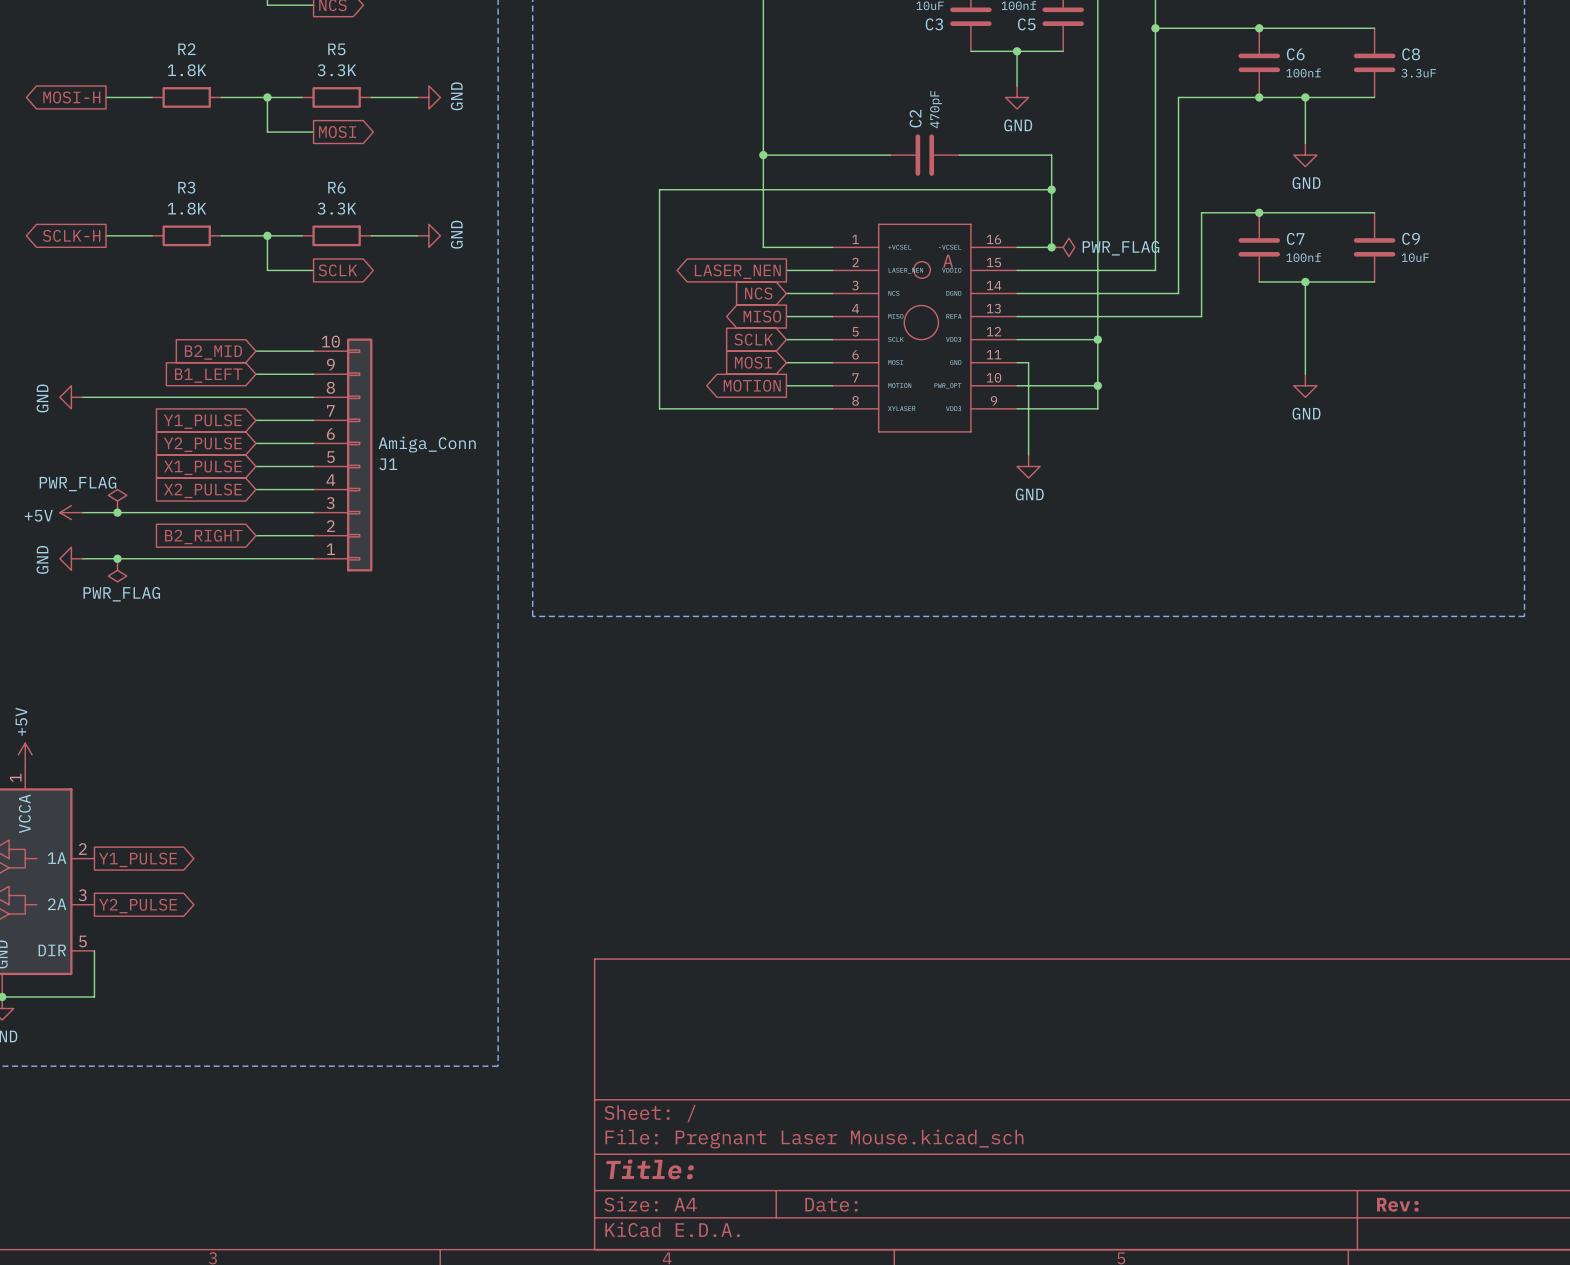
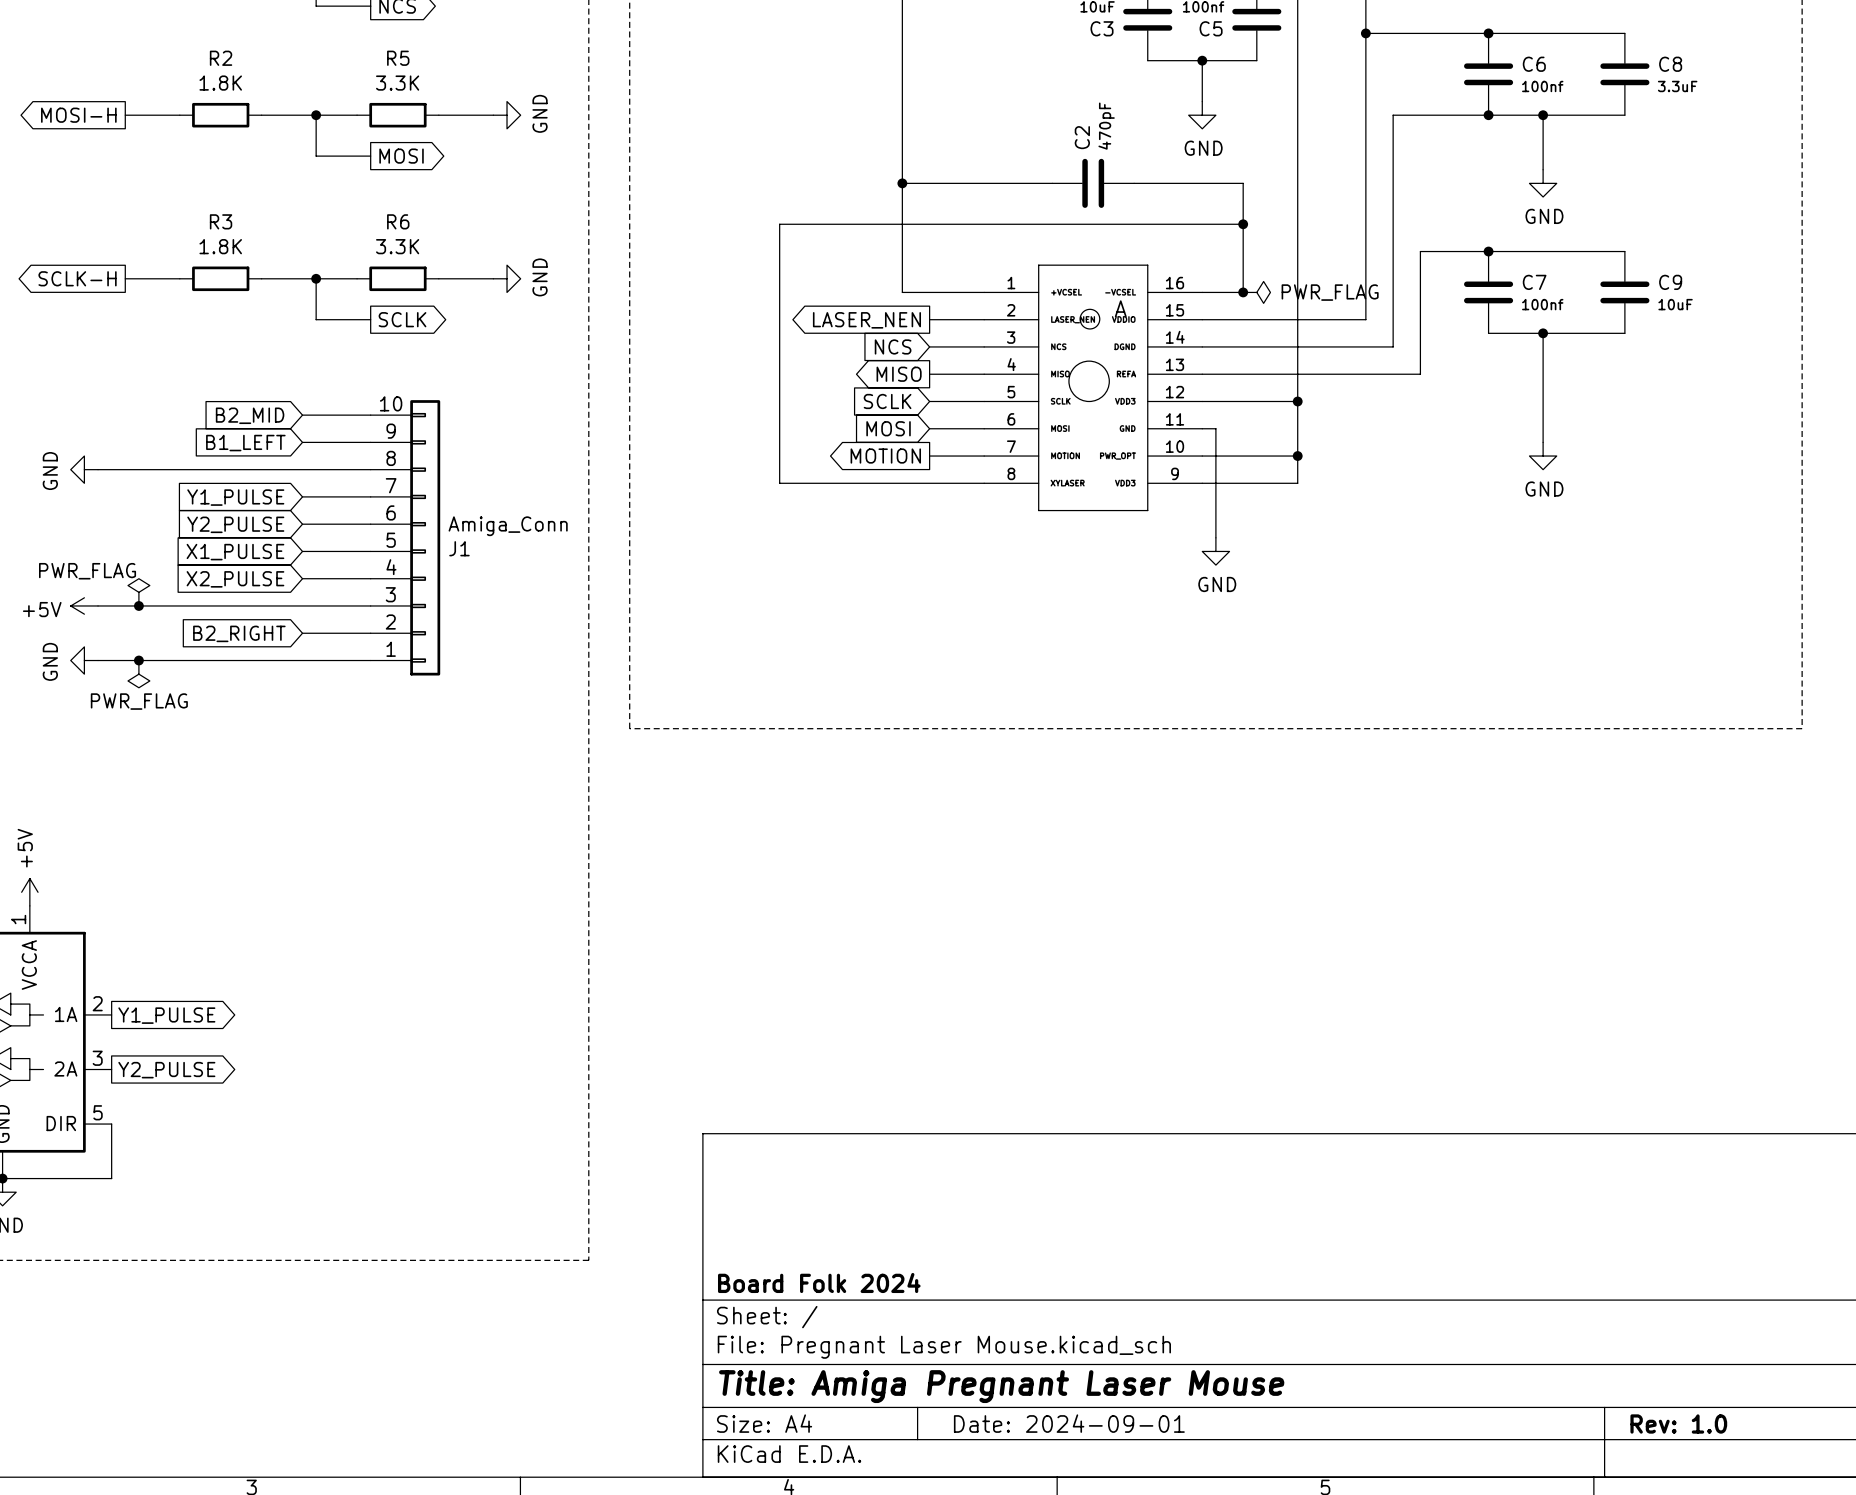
title block: none -> Board Folk 2024 (819, 1282)
title block: Title: (650, 1169) -> Title: Amiga Pregnant Laser Mouse (1001, 1386)
title block: Date: (831, 1204) -> Date: 2024-09-01 (1069, 1423)
title block: Rev: (1397, 1204) -> Rev: 1.0 (1678, 1424)

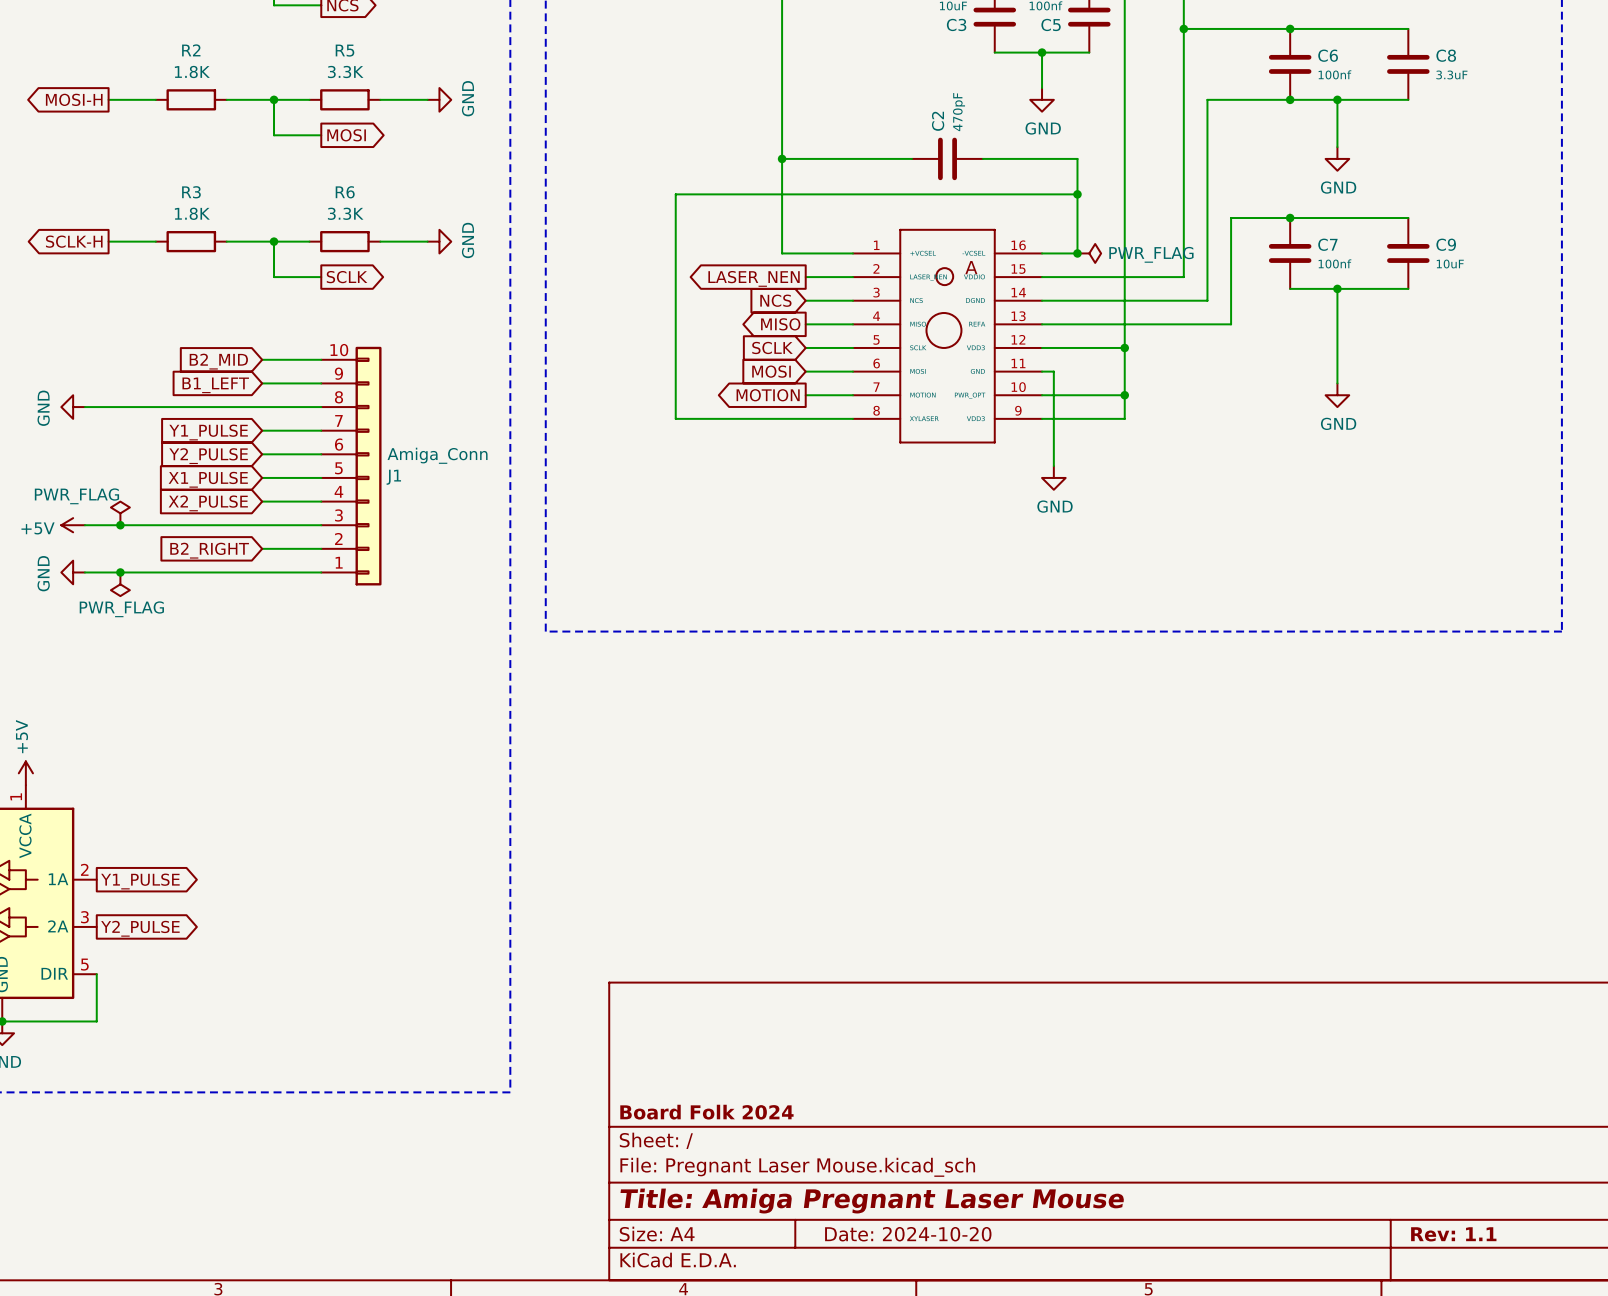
title block: Date: 2024-09-01 (1069, 1423) -> Date: 2024-10-20 (908, 1234)
title block: Rev: 1.0 (1678, 1424) -> Rev: 1.1 (1453, 1234)

